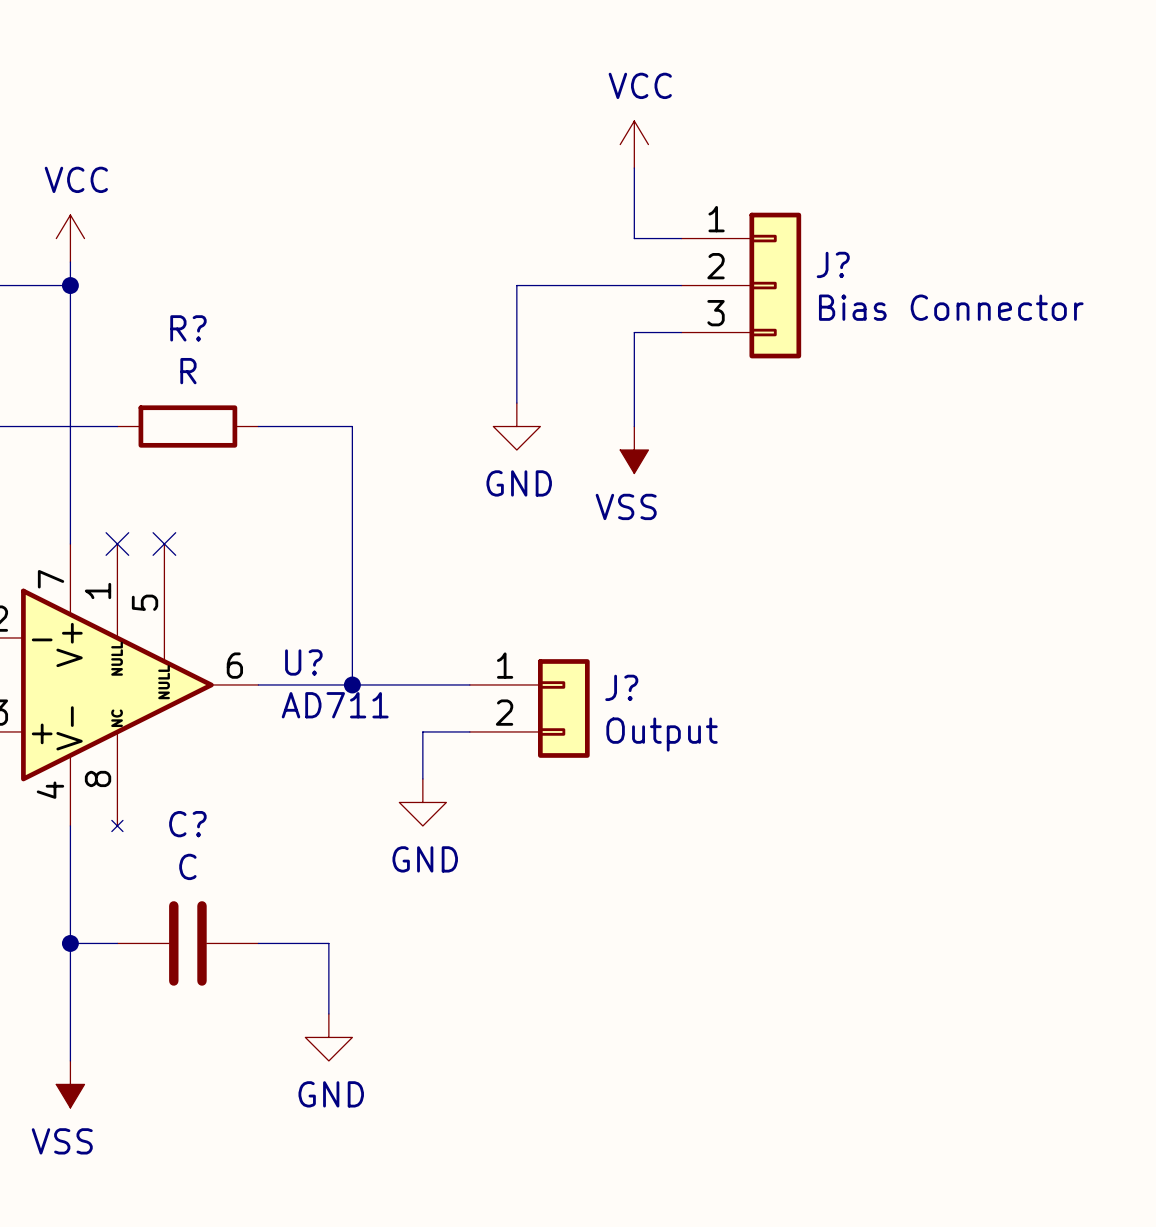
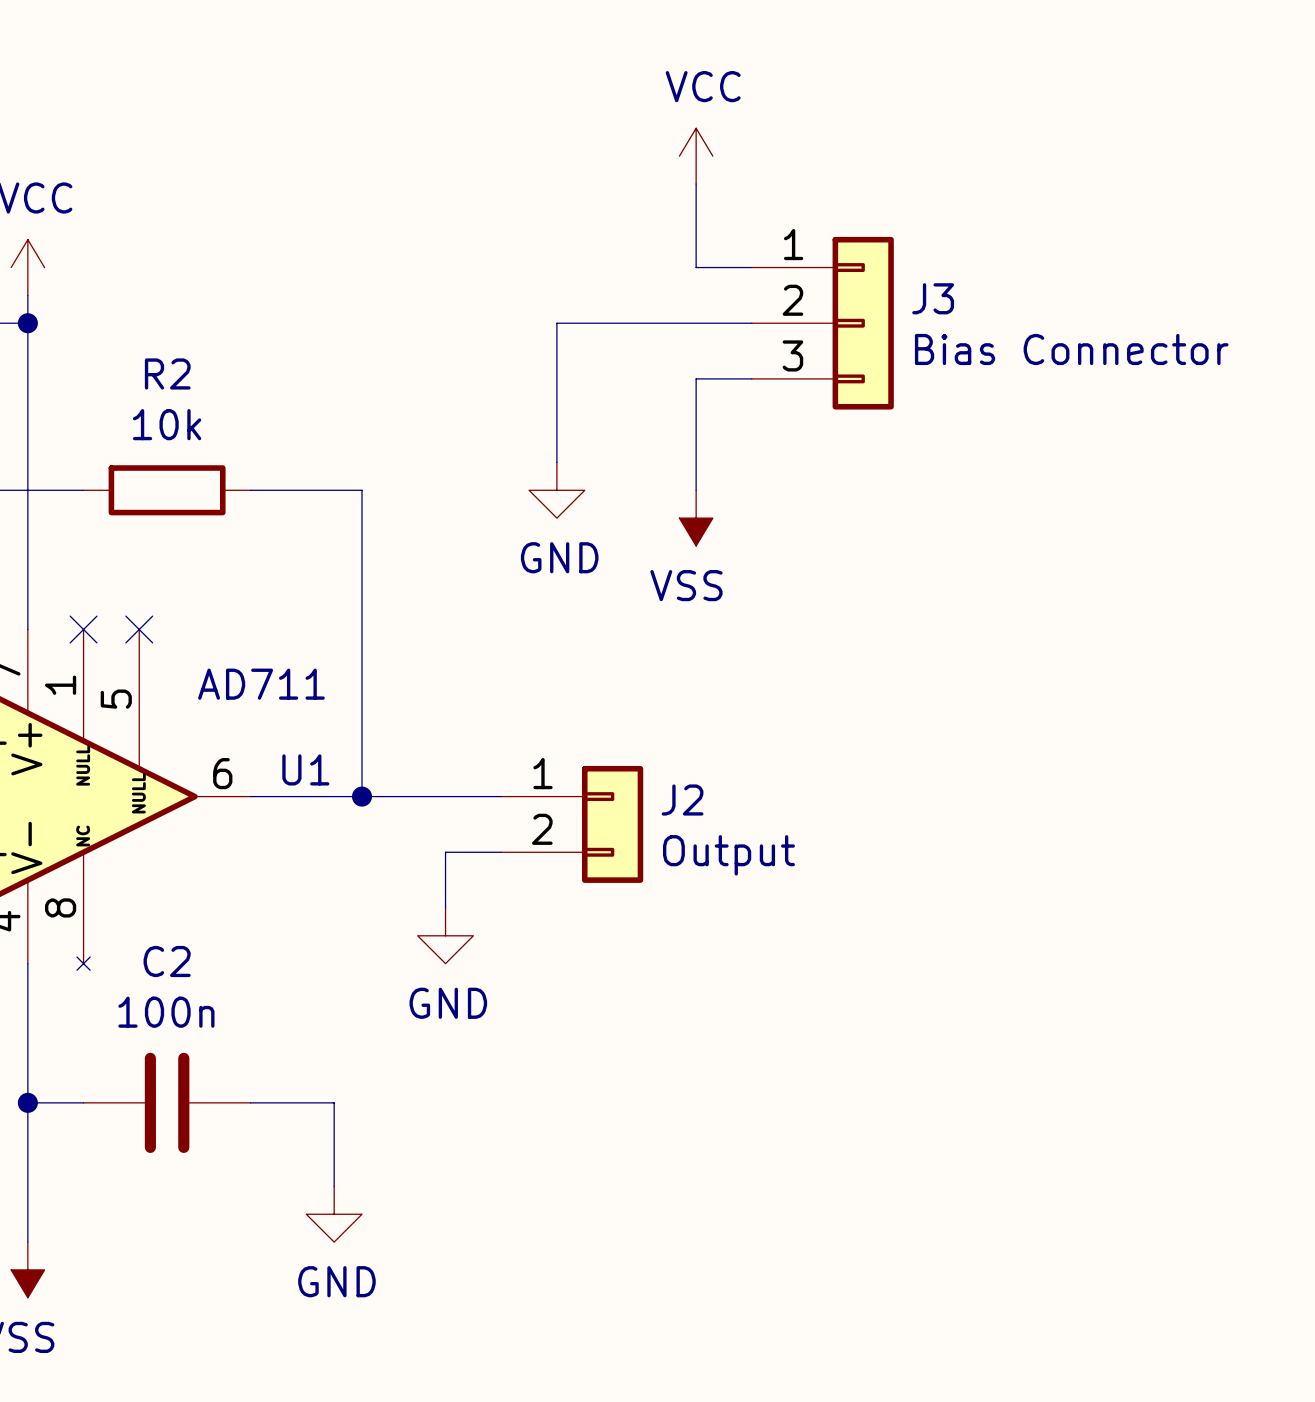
J? name: J? (833, 264) -> J3 (933, 298)
R? name: R? (188, 328) -> R2 (167, 373)
R? value: R (188, 371) -> 10k (167, 424)
U? name: U? (303, 662) -> U1 (305, 769)
J? name: J? (621, 687) -> J2 (682, 800)
U? value position: AD711 (335, 705) -> AD711 (261, 684)
C? name: C? (187, 824) -> C2 (167, 961)
C? value: C (187, 866) -> 100n (166, 1012)

